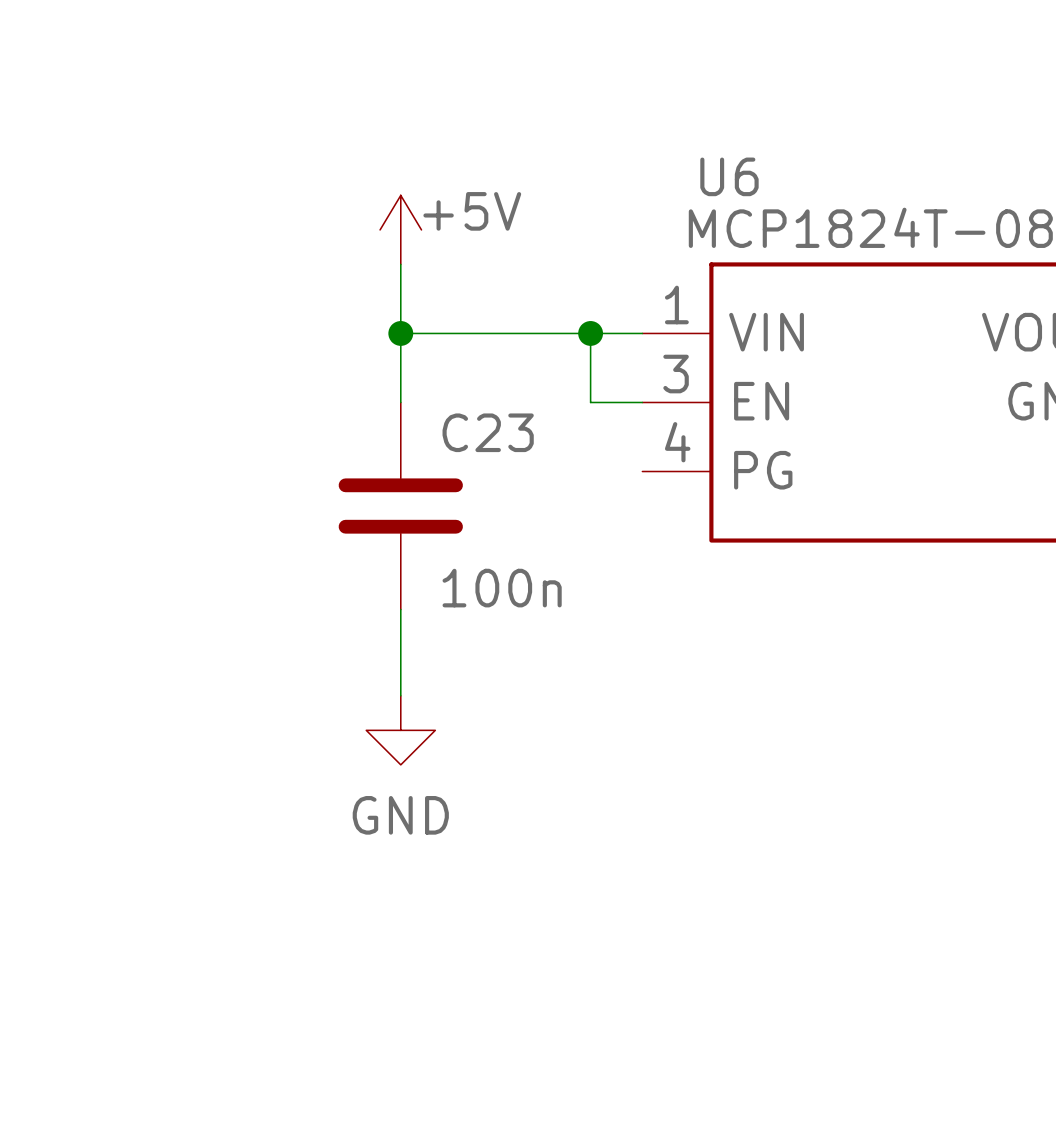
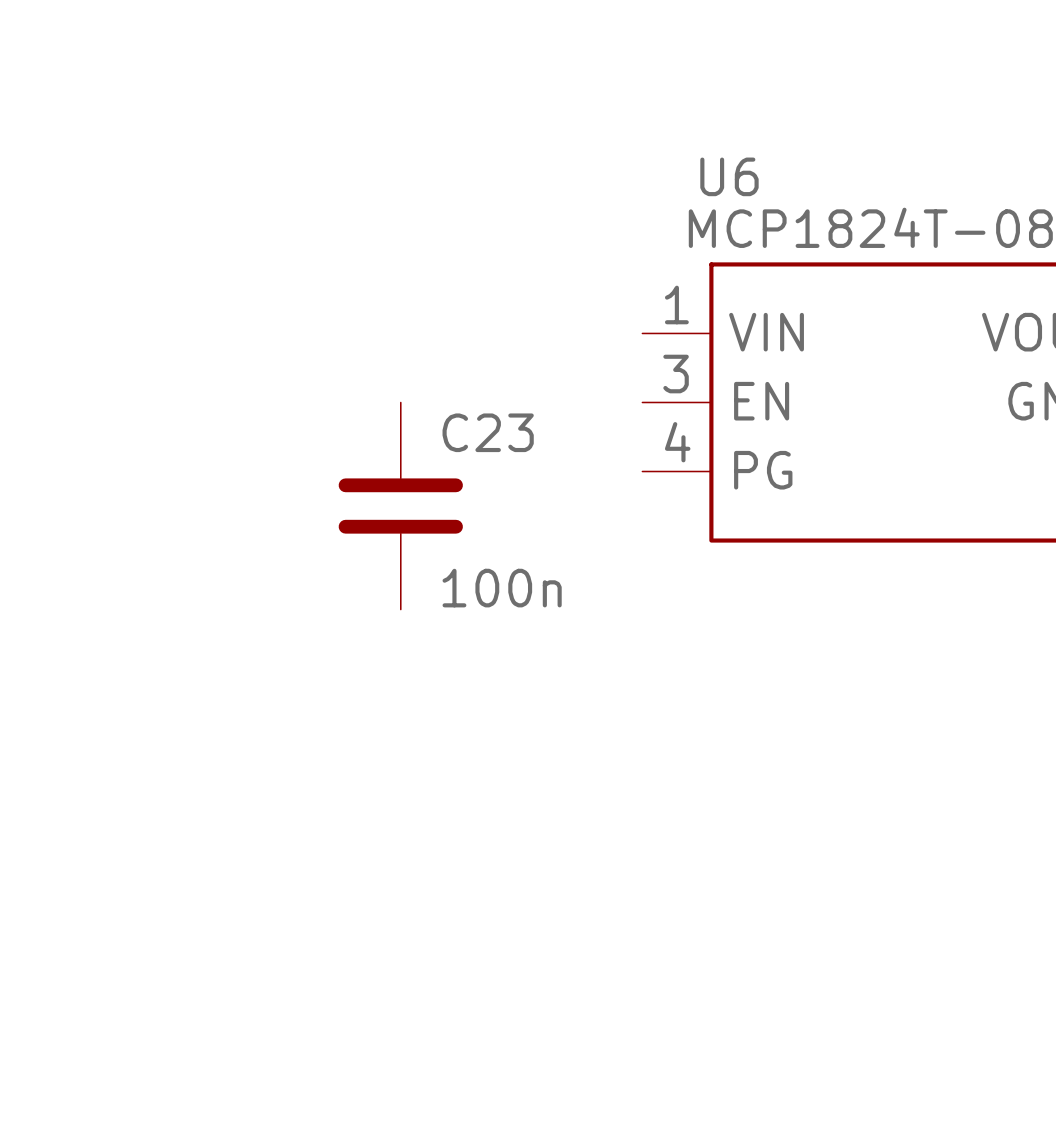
power symbol: +5V (400, 229) -> none
wire: (400, 264) (400, 402) -> none
wire: (400, 333) (642, 333) -> none
junction: (400, 333) -> none
wire: (590, 333) (590, 402) (642, 402) -> none
junction: (590, 333) -> none
wire: (400, 609) (400, 695) -> none
power symbol: GND (400, 730) -> none

